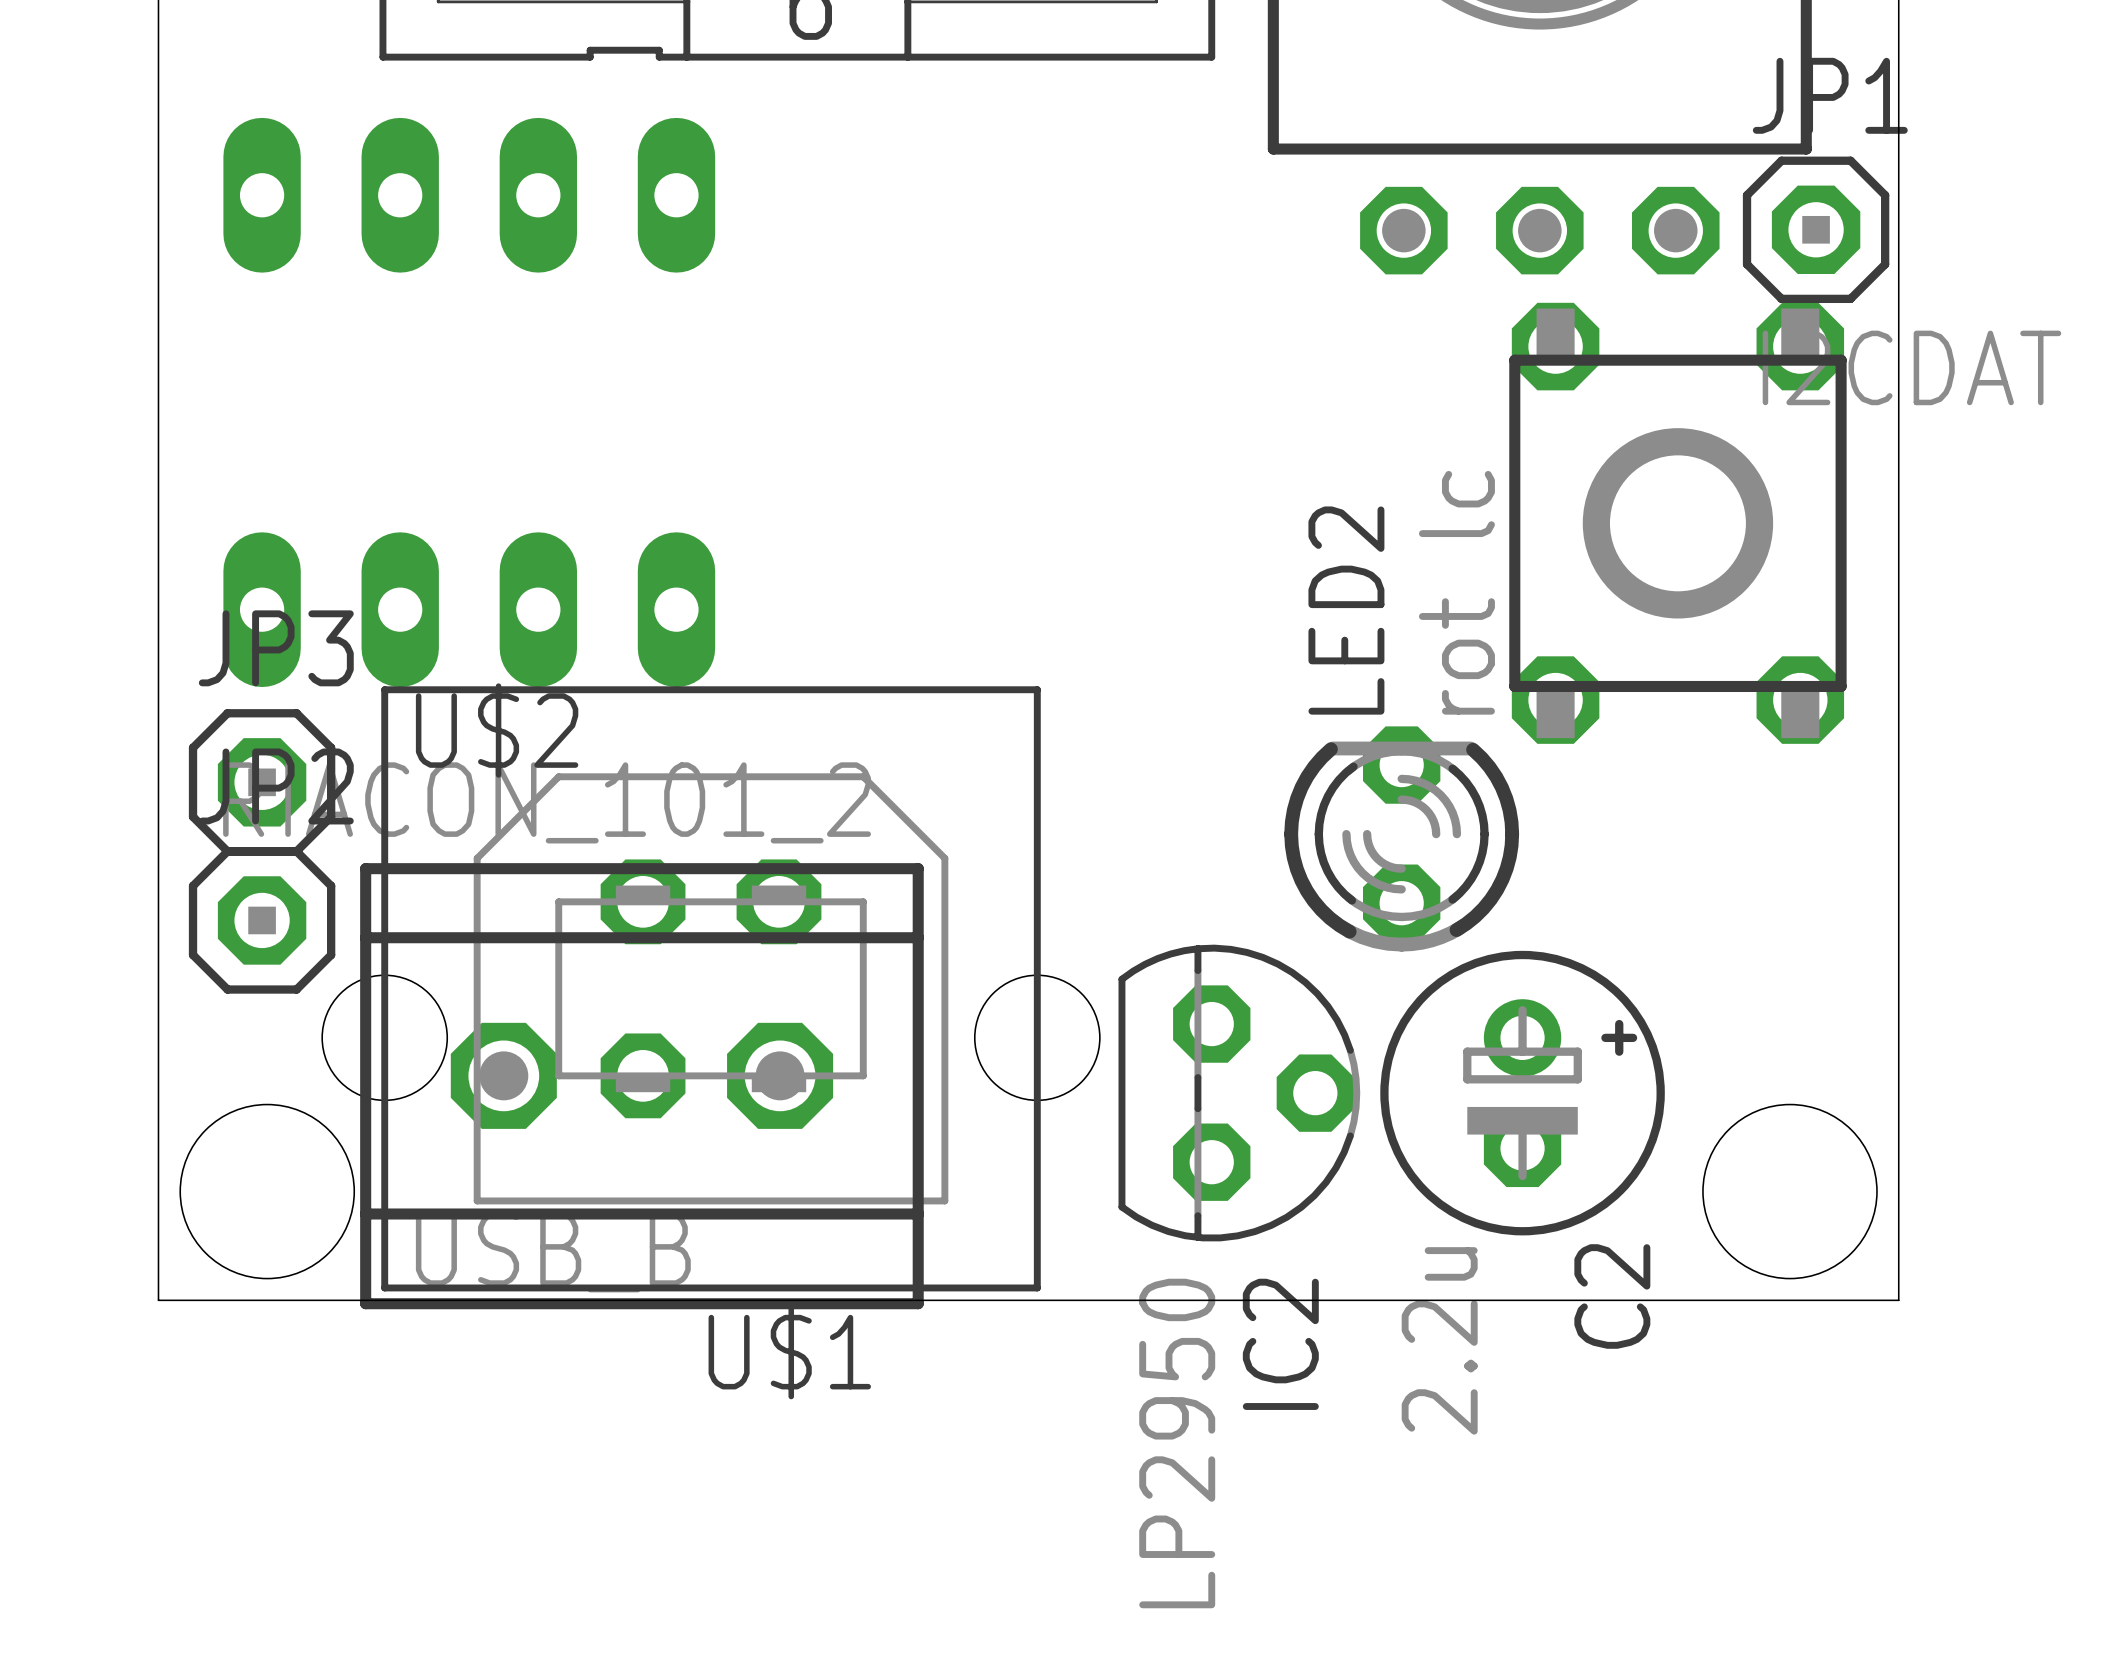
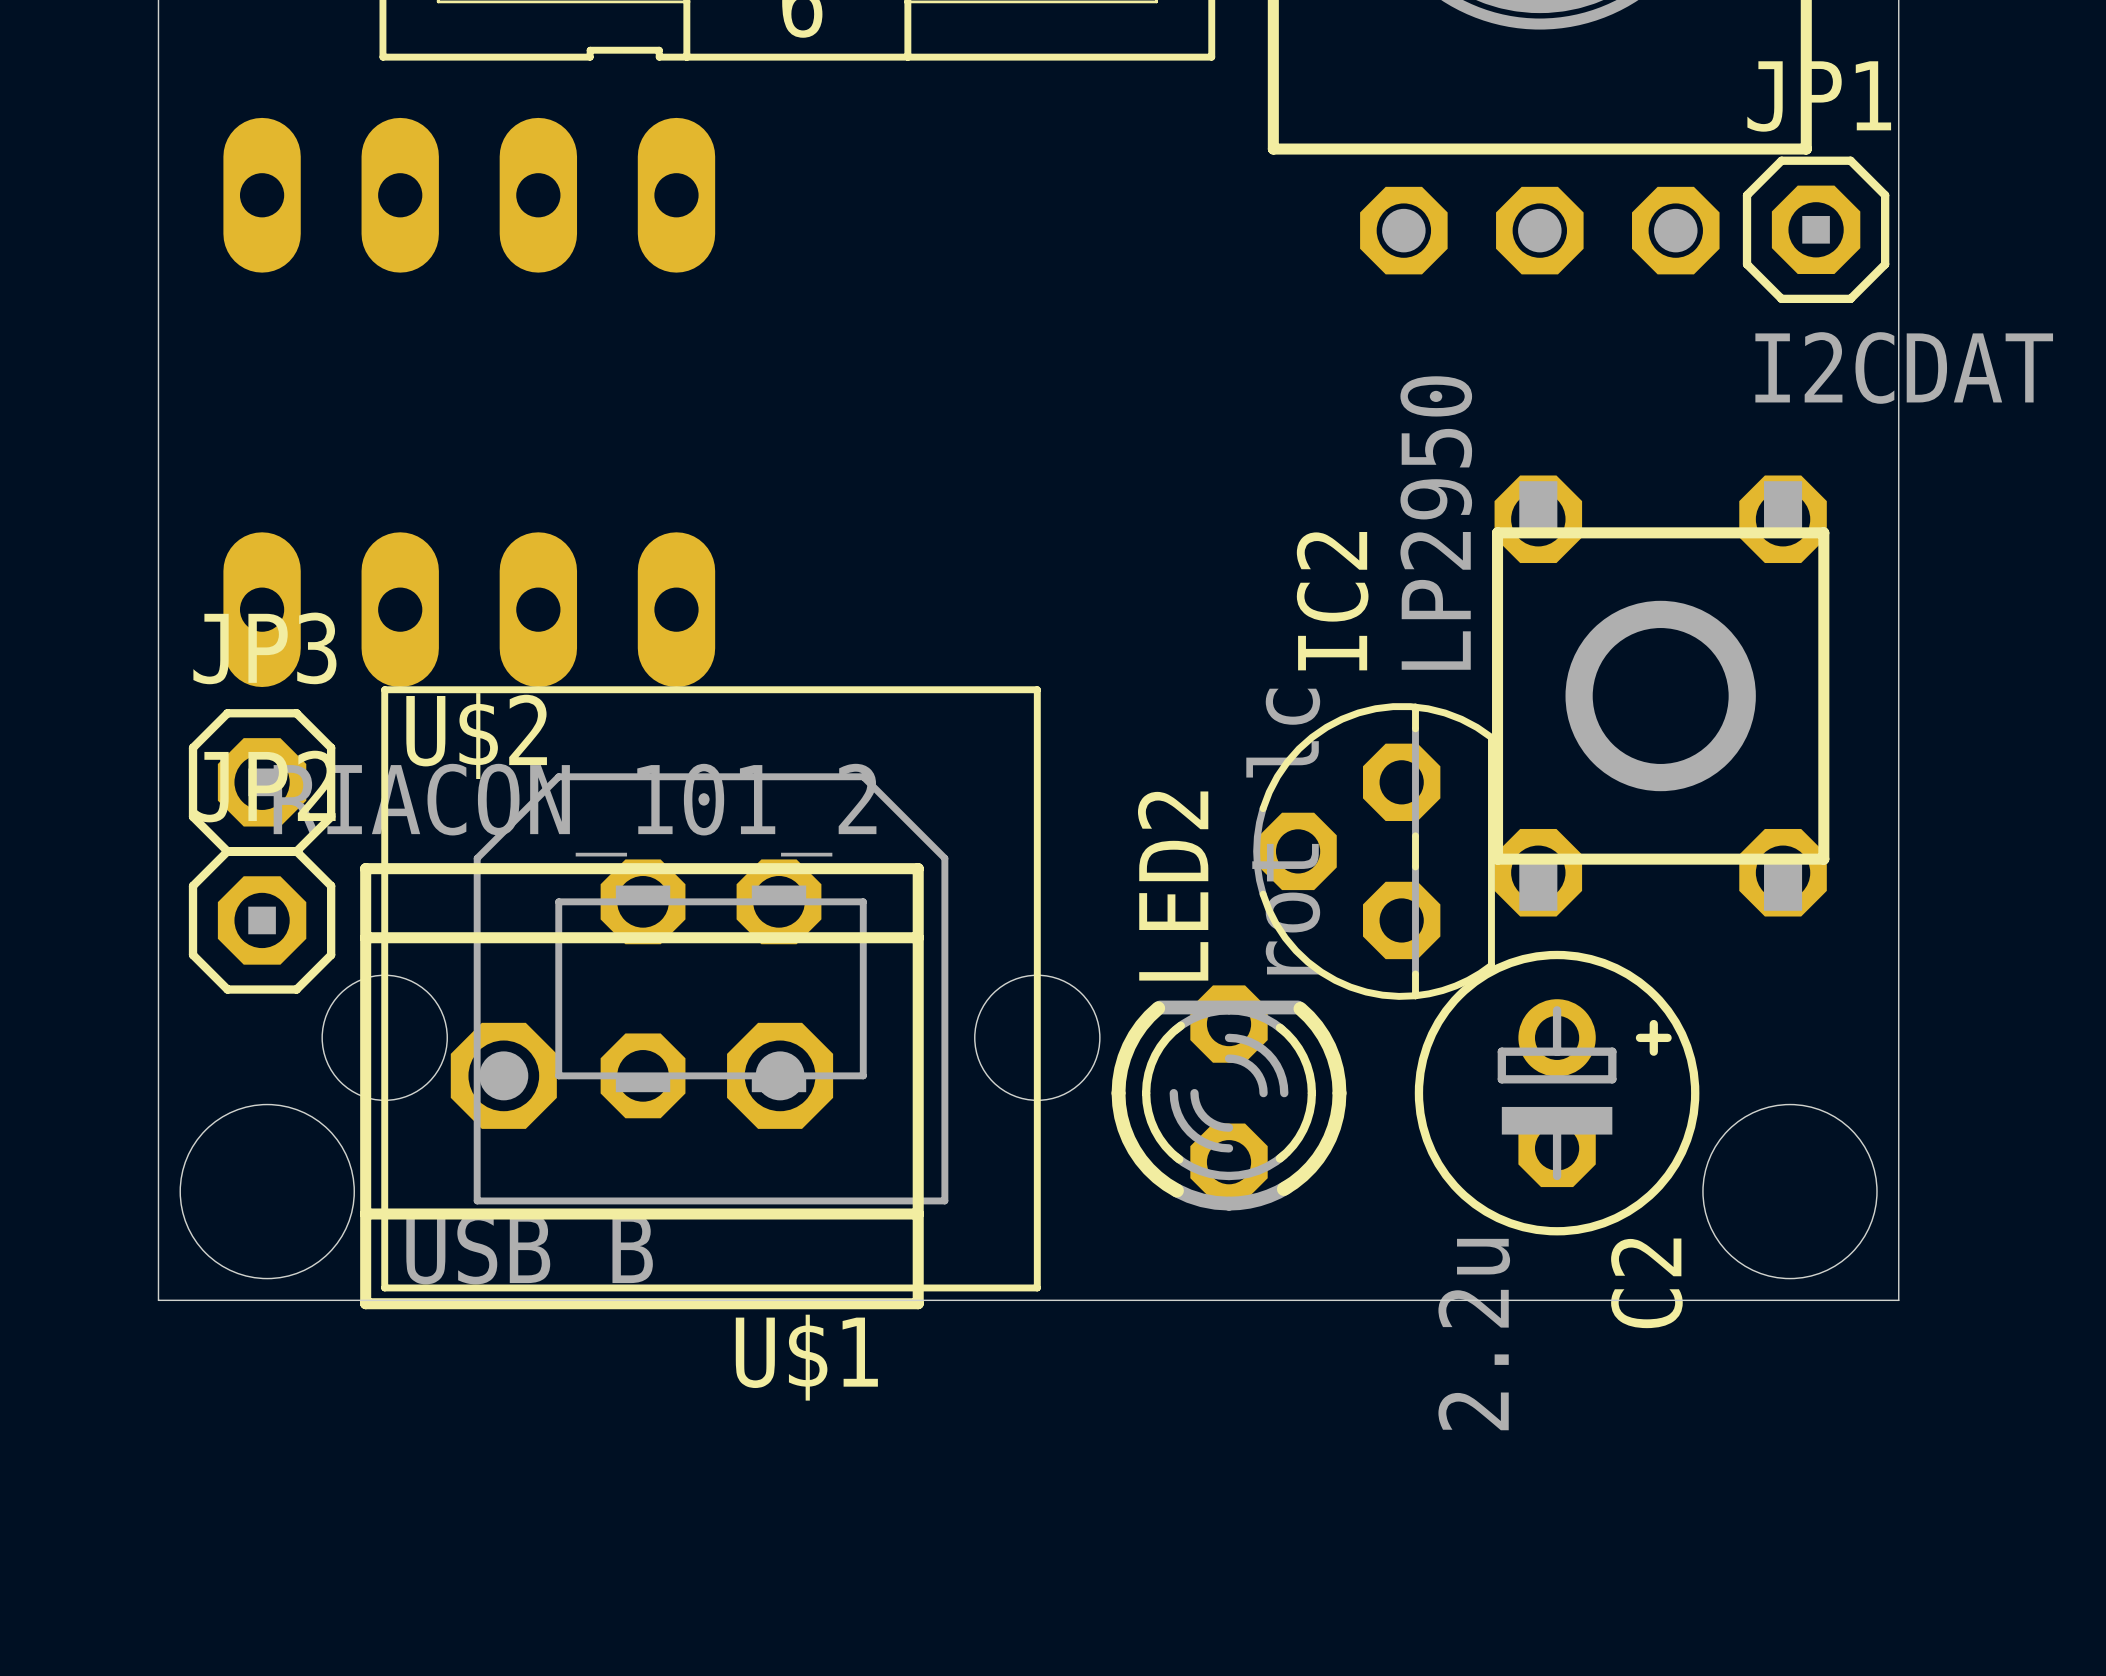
part position: (1677, 523) -> (1660, 696)
LED2 position: (1401, 838) -> (1229, 1097)
IC2 footprint: [1118, 944, 1361, 1242] -> [1253, 703, 1495, 1000]
C2 position: (1522, 1093) -> (1557, 1093)
IC2 name position: IC2 (1280, 1344) -> IC2 (1332, 601)
IC2 value position: LP2950 (1177, 1443) -> LP2950 (1436, 523)

